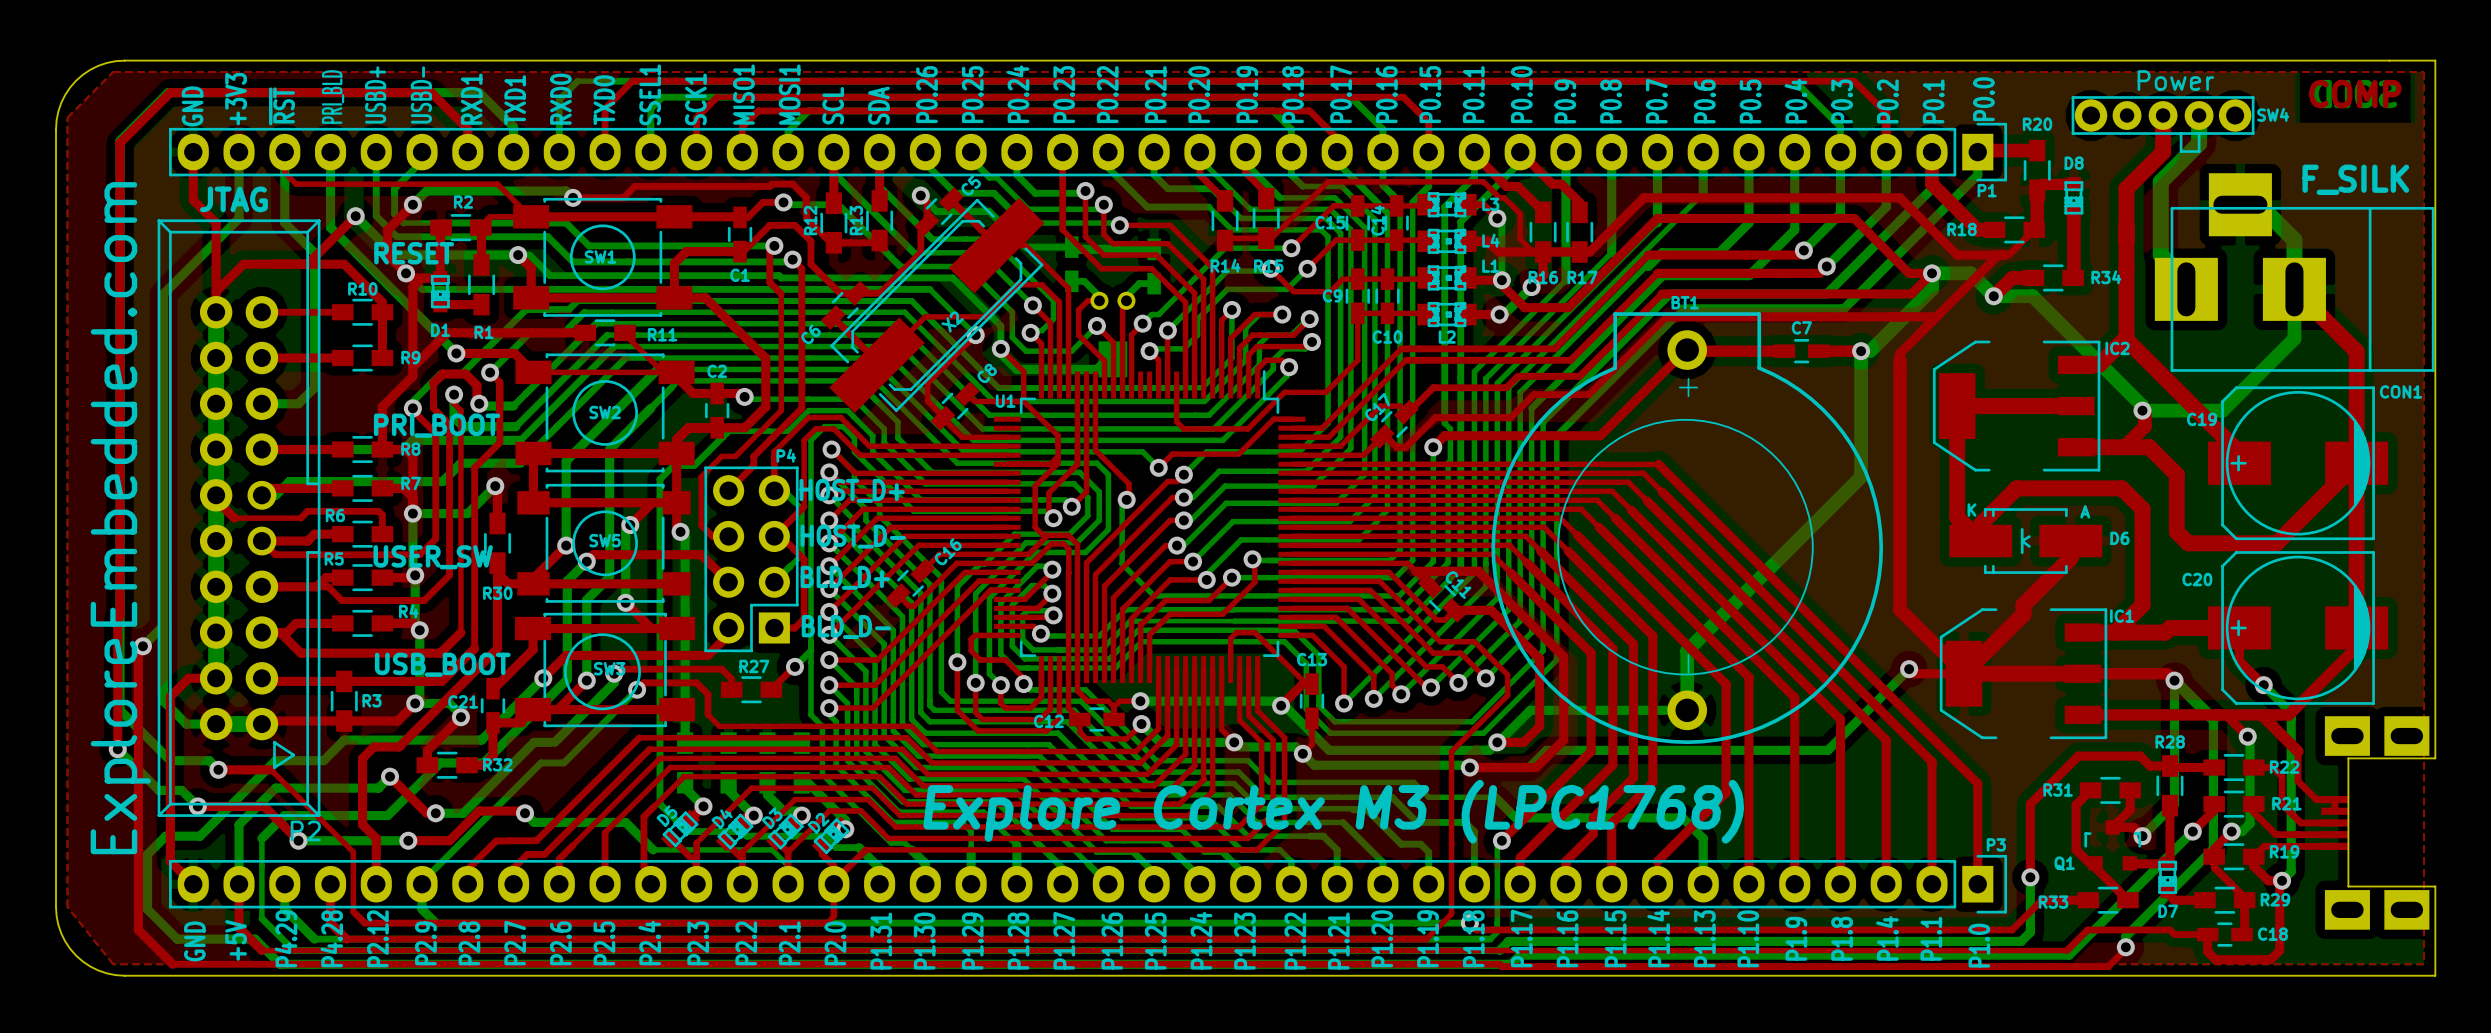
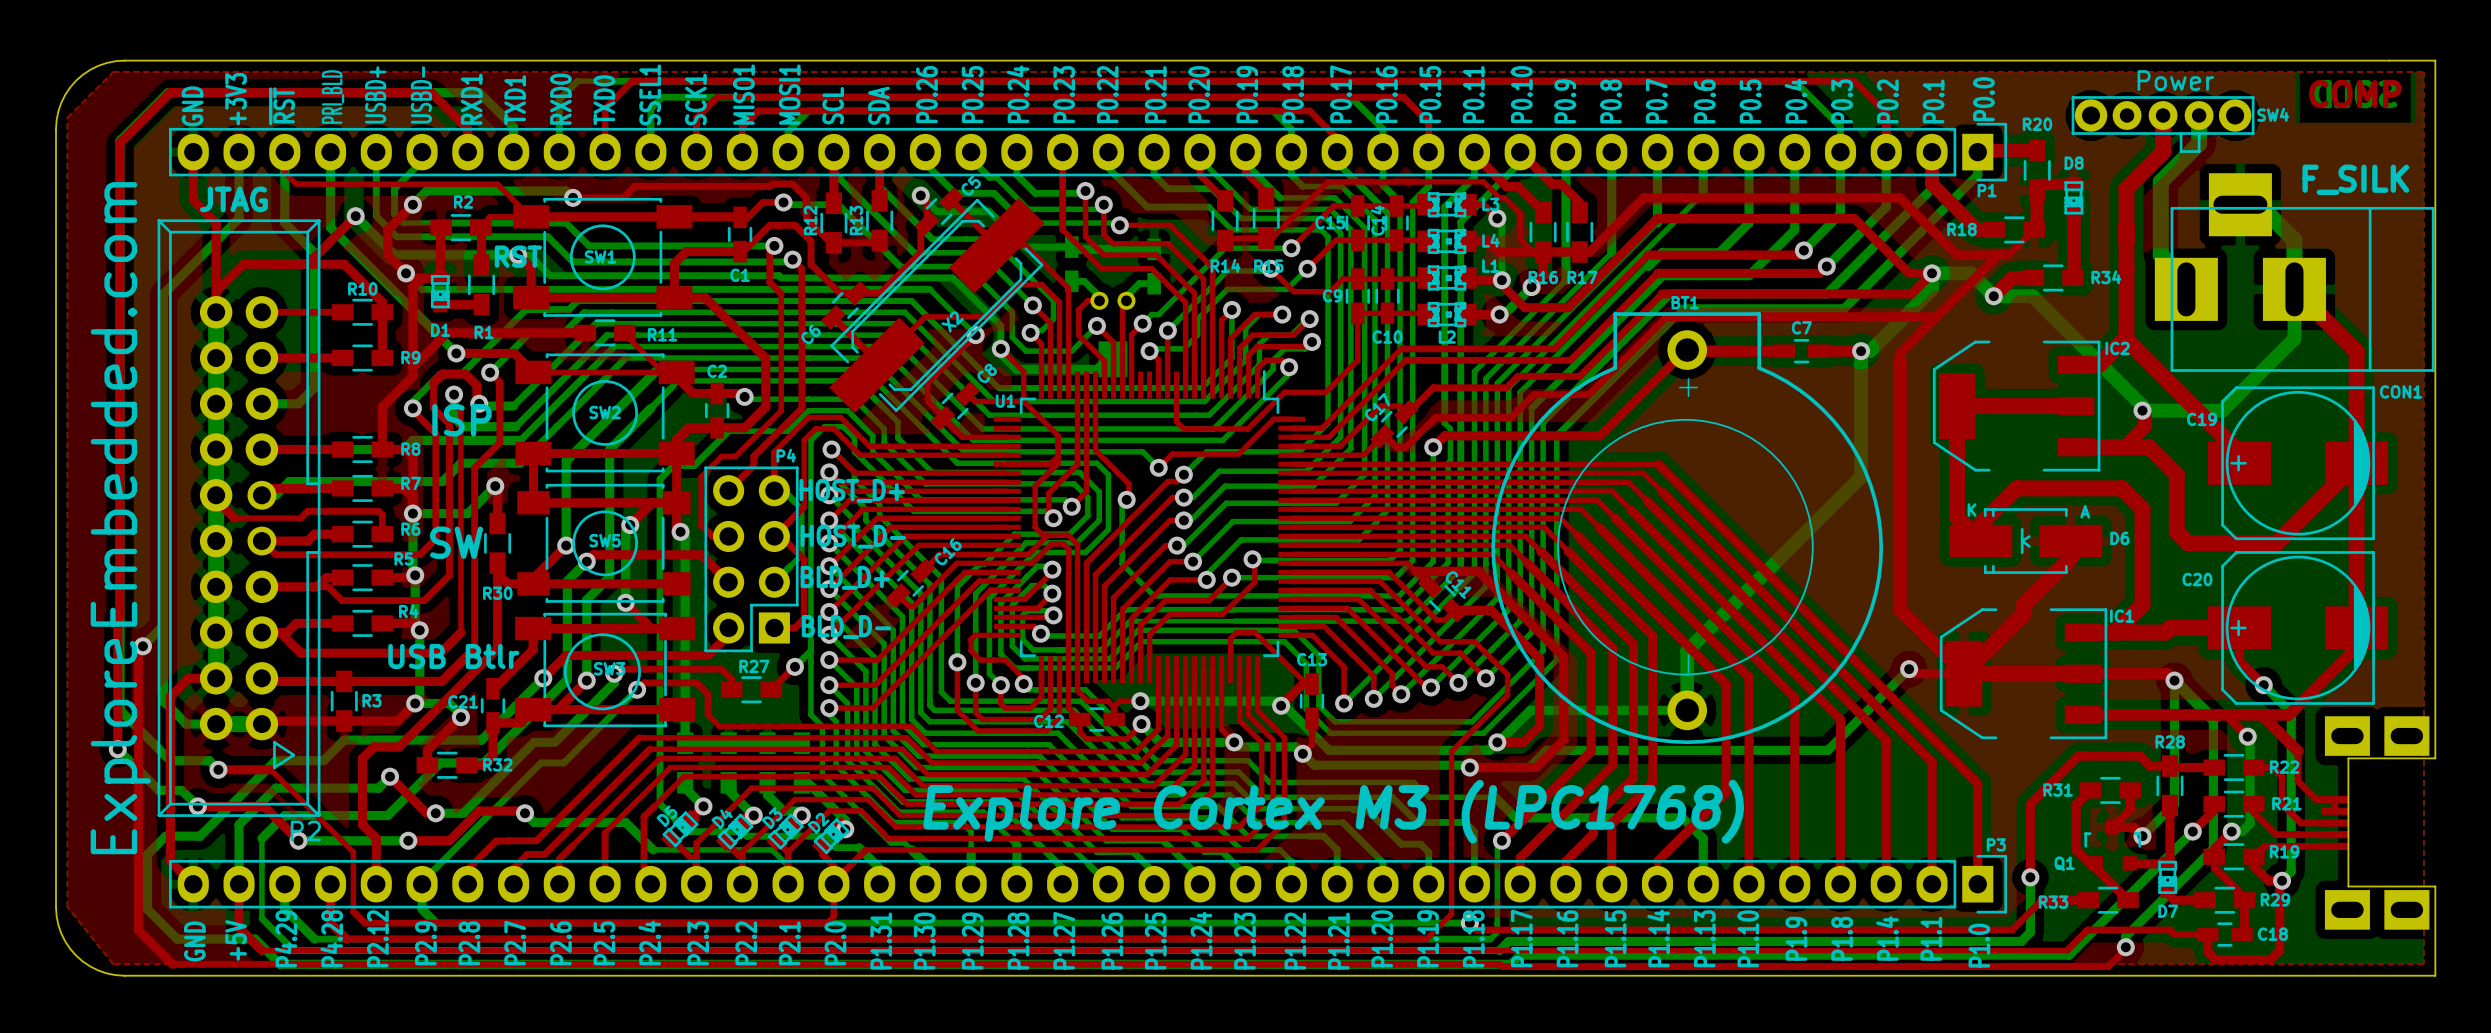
text: RESET (414, 253) -> none
text: none -> RST (518, 256)
text: none -> ISP (461, 420)
text: PRI_BOOT (437, 425) -> none
R6 name position: R6 (335, 515) -> R6 (410, 529)
text: none -> SW (456, 542)
text: USER_SW (433, 557) -> none
R5 name position: R5 (334, 558) -> R5 (404, 558)
text: USB_BOOT (442, 664) -> USB Btlr (453, 656)

